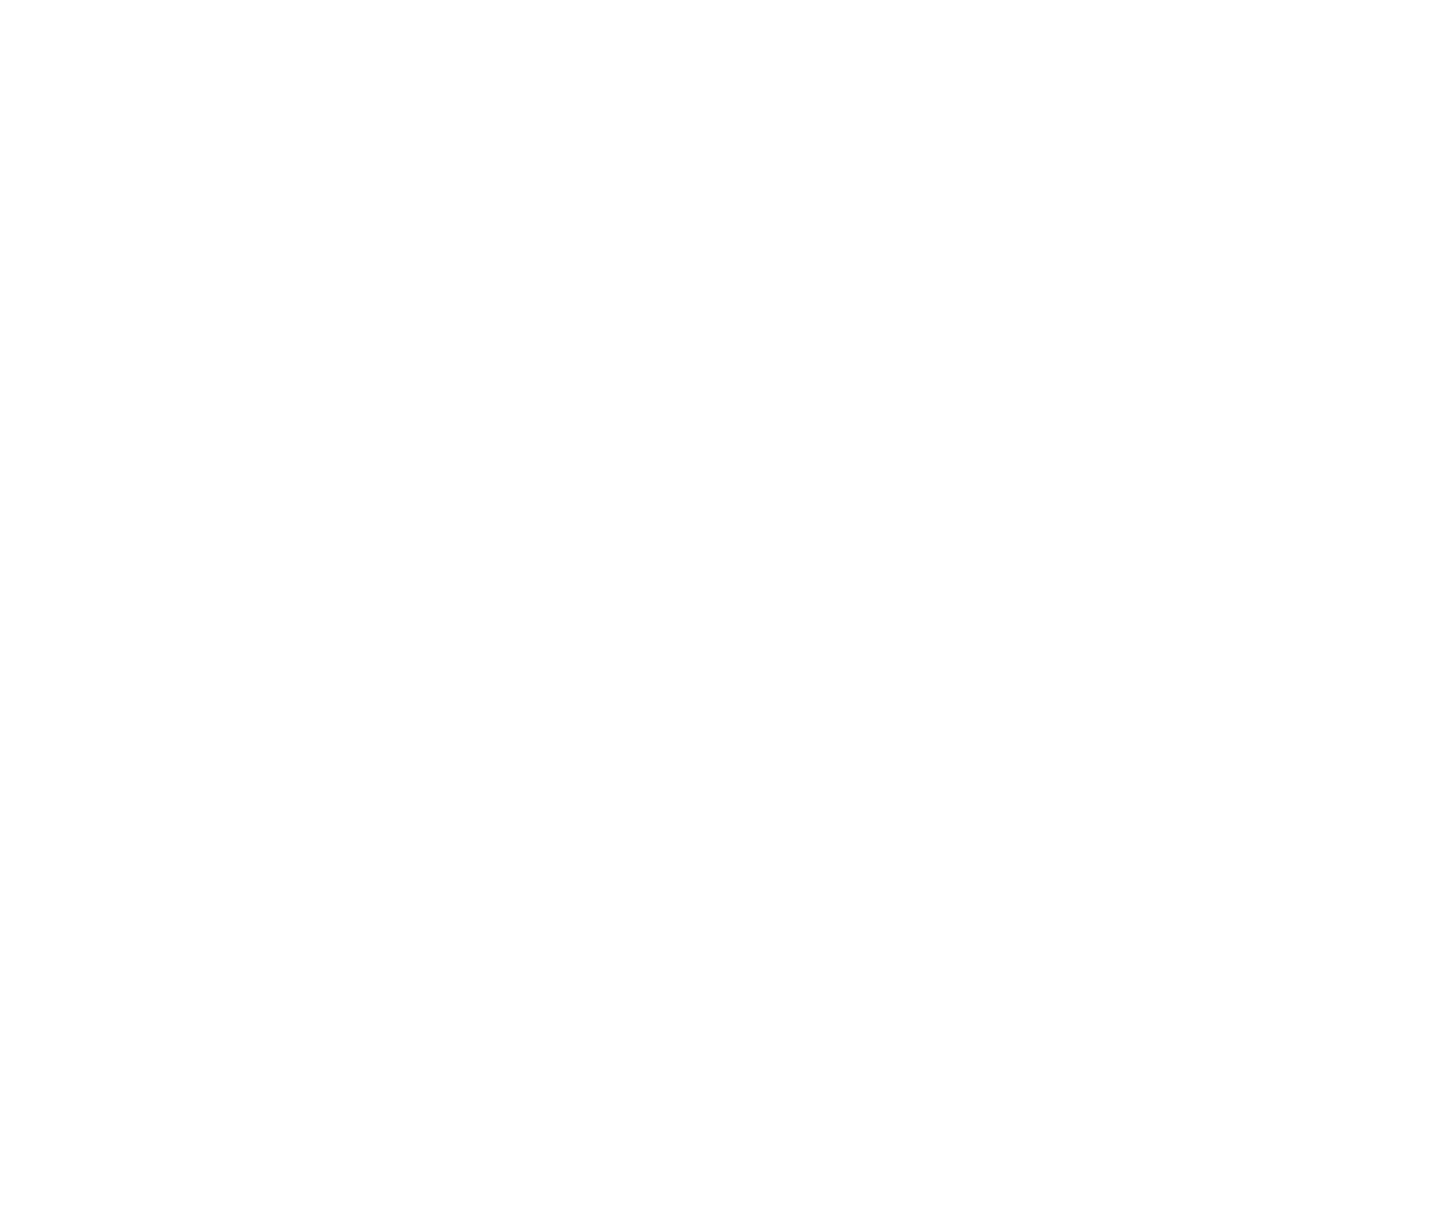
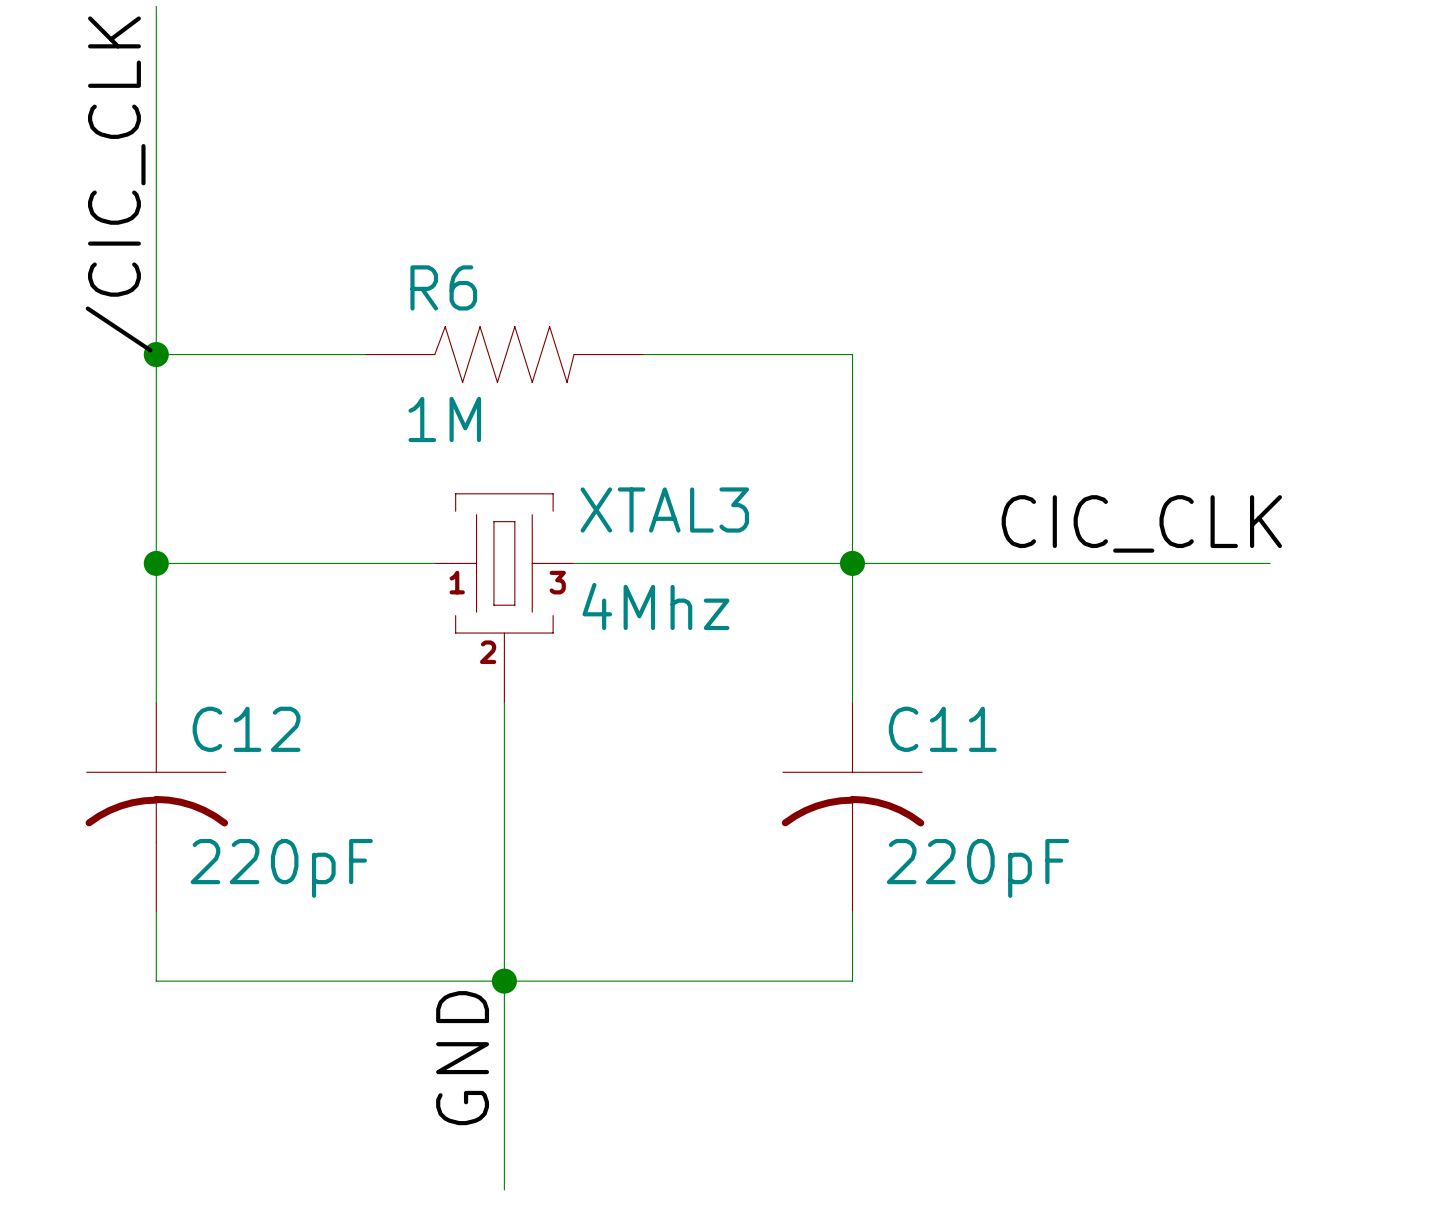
wire: none -> (156, 6) (156, 702)
label: none -> /CIC_CLK (119, 184)
wire: none -> (156, 354) (365, 354)
junction: none -> (156, 354)
R6: none -> 1M (504, 354)
wire: none -> (643, 354) (852, 354) (852, 702)
label: none -> CIC_CLK (1141, 523)
wire: none -> (156, 563) (434, 563)
junction: none -> (156, 563)
wire: none -> (574, 563) (1270, 563)
junction: none -> (852, 563)
XTAL3: none -> 4Mhz (504, 598)
wire: none -> (504, 702) (504, 1189)
C12: none -> 220pF (156, 807)
C11: none -> 220pF (853, 807)
wire: none -> (156, 911) (156, 981) (852, 981) (852, 911)
junction: none -> (504, 981)
label: none -> GND (462, 1058)

